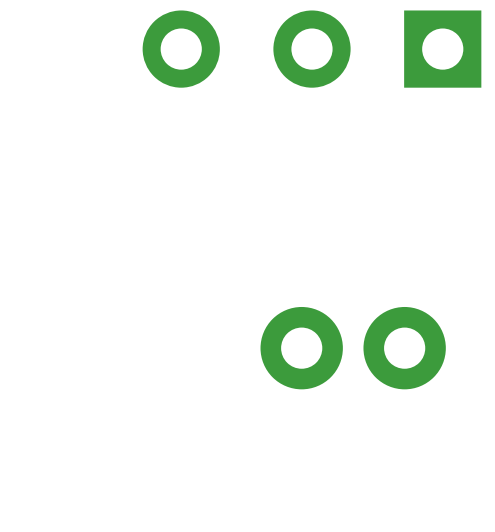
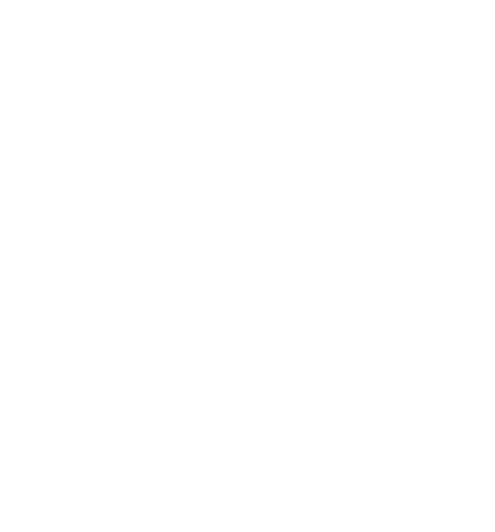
part: (311, 49) -> none
part: (353, 348) -> none

